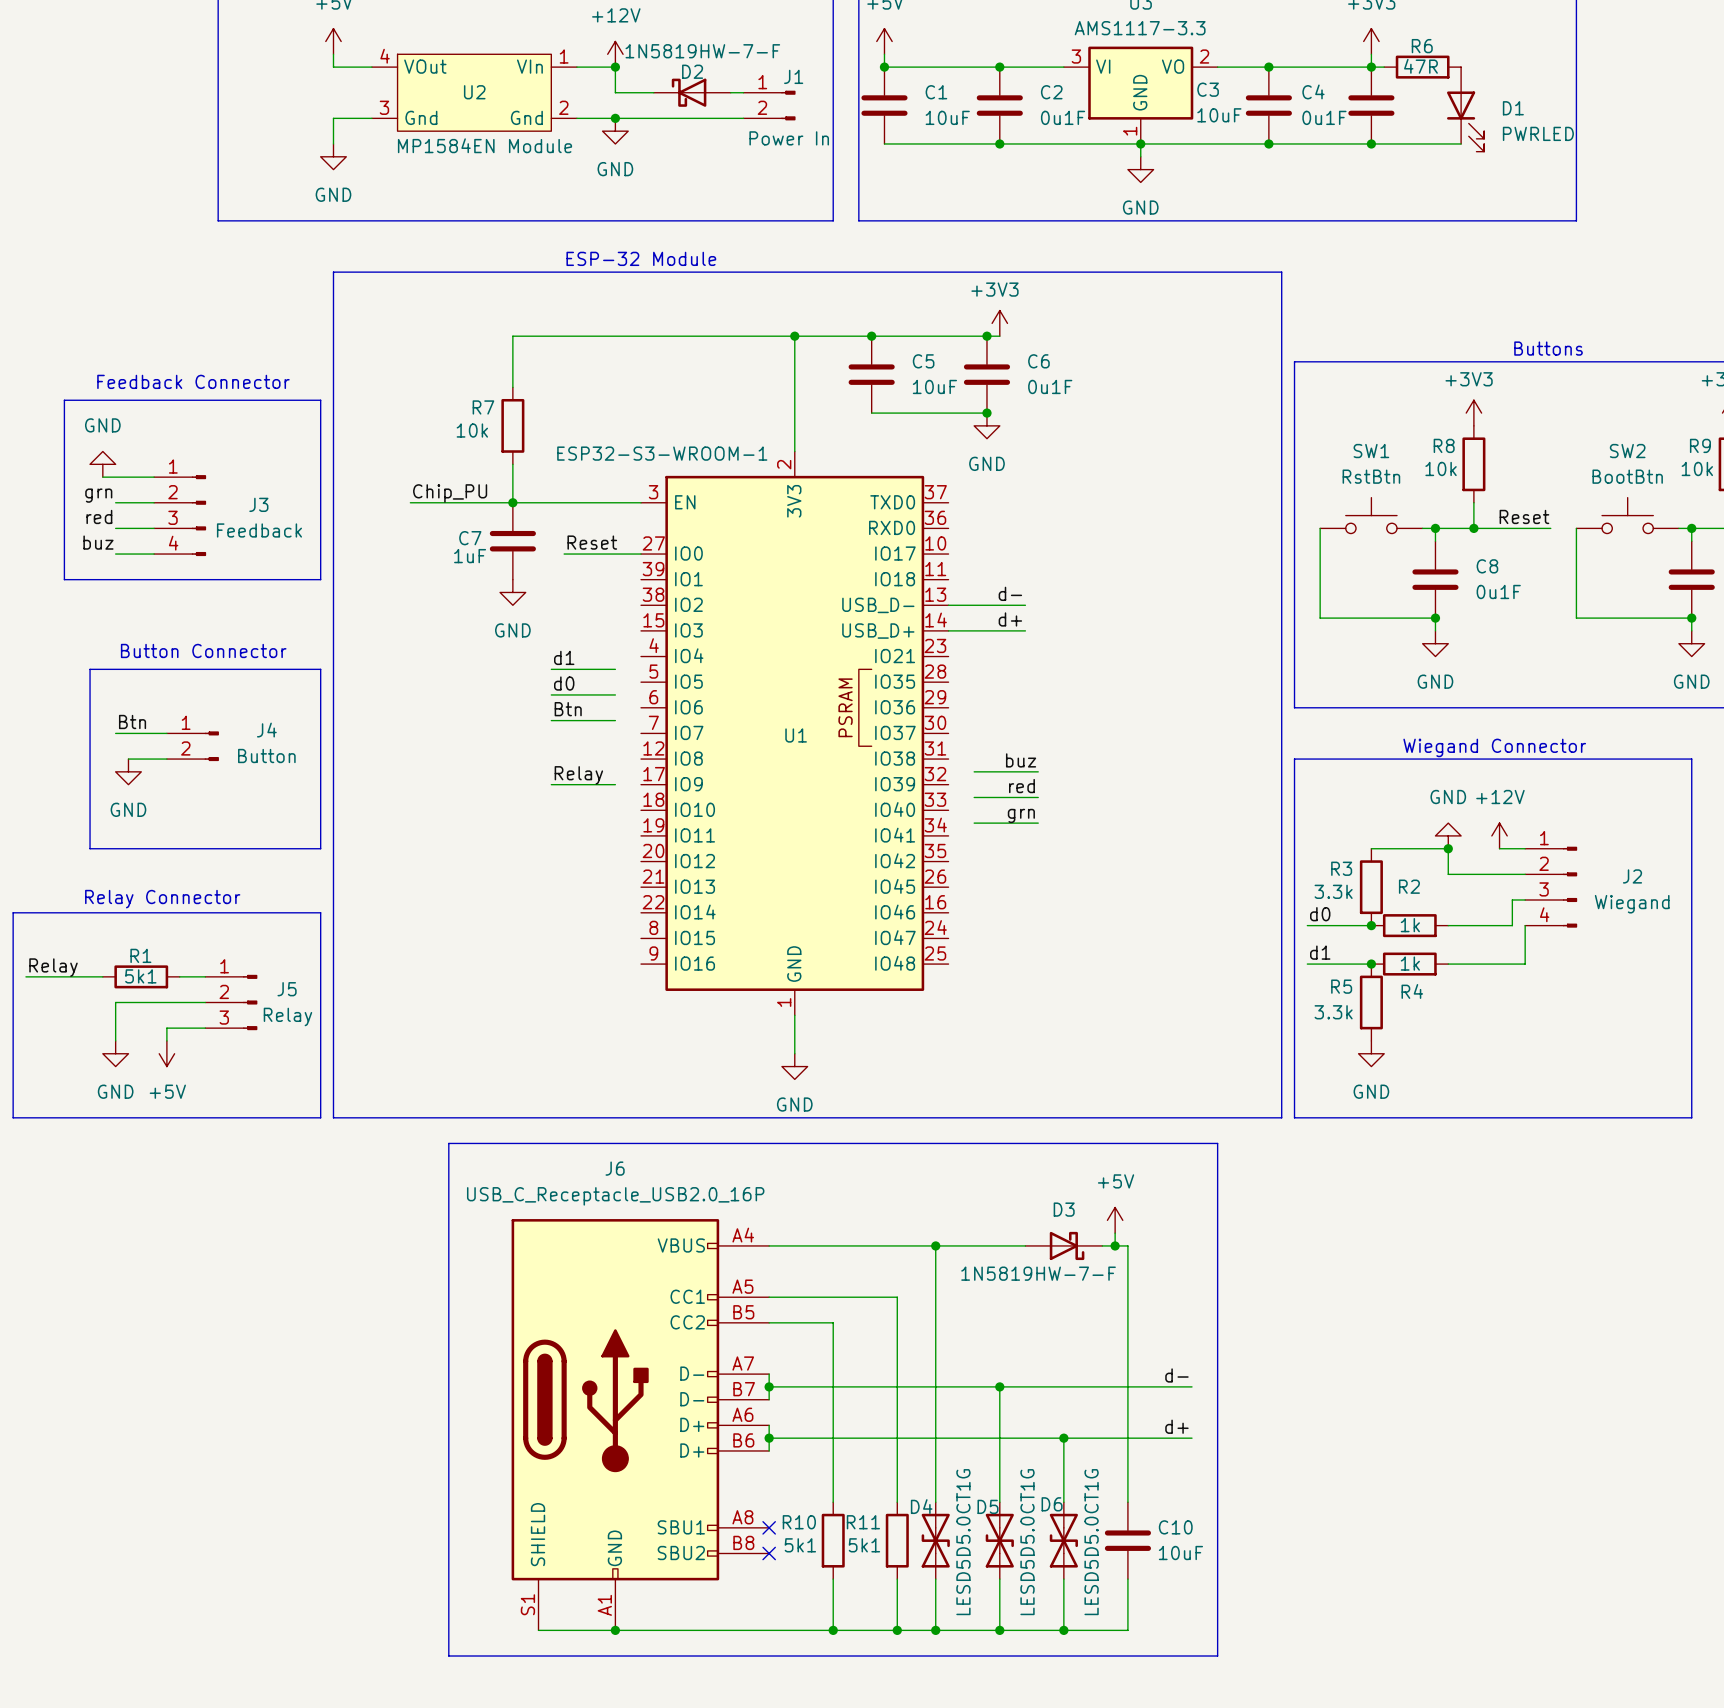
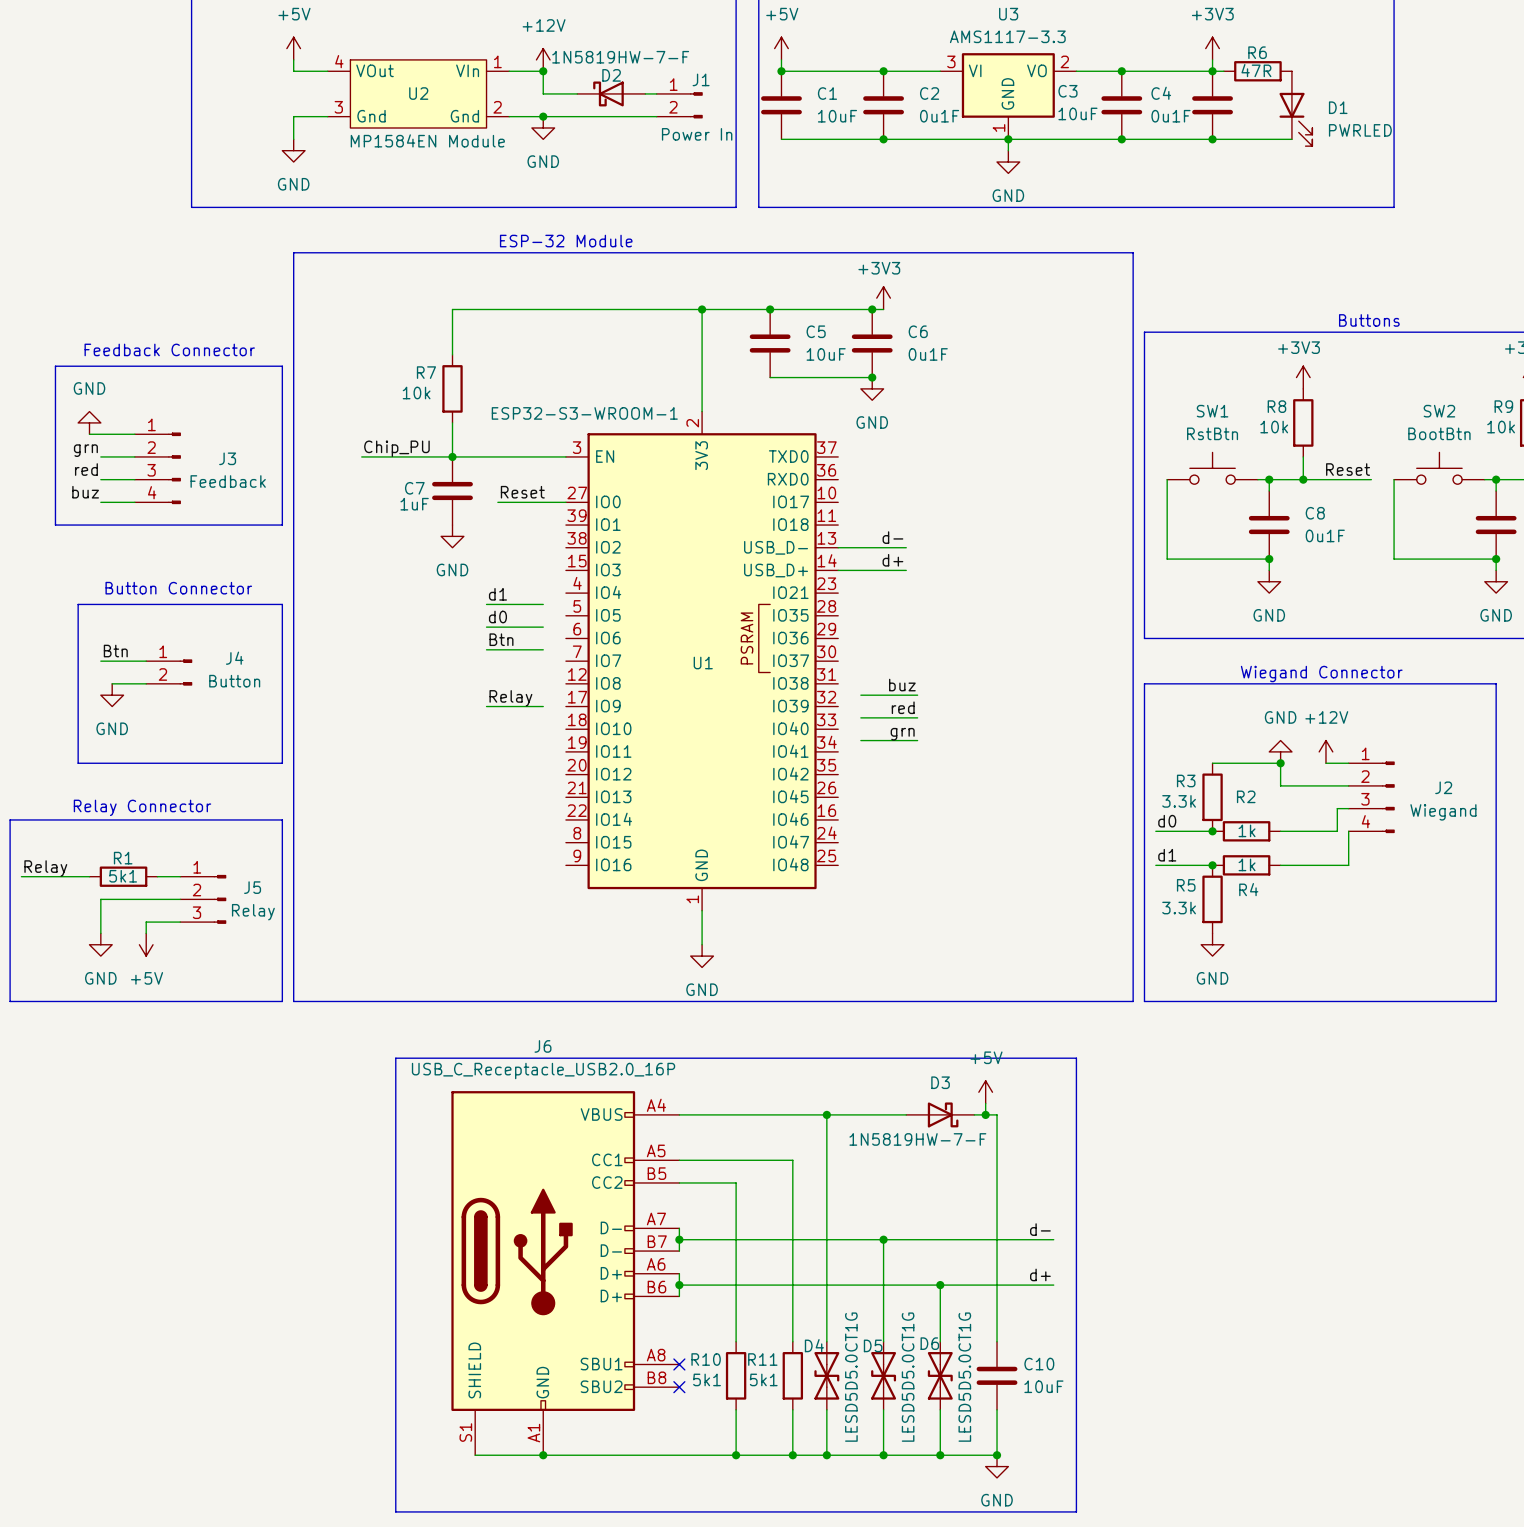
line: (448, 1181) (448, 1143) (1217, 1143) (1217, 1181) -> (395, 1058) (1076, 1058)
junction: none -> (997, 1455)
power symbol: none -> GND (997, 1466)
line: (448, 1656) (1217, 1656) -> (395, 1477) (395, 1511) (1076, 1511) (1076, 1477)

